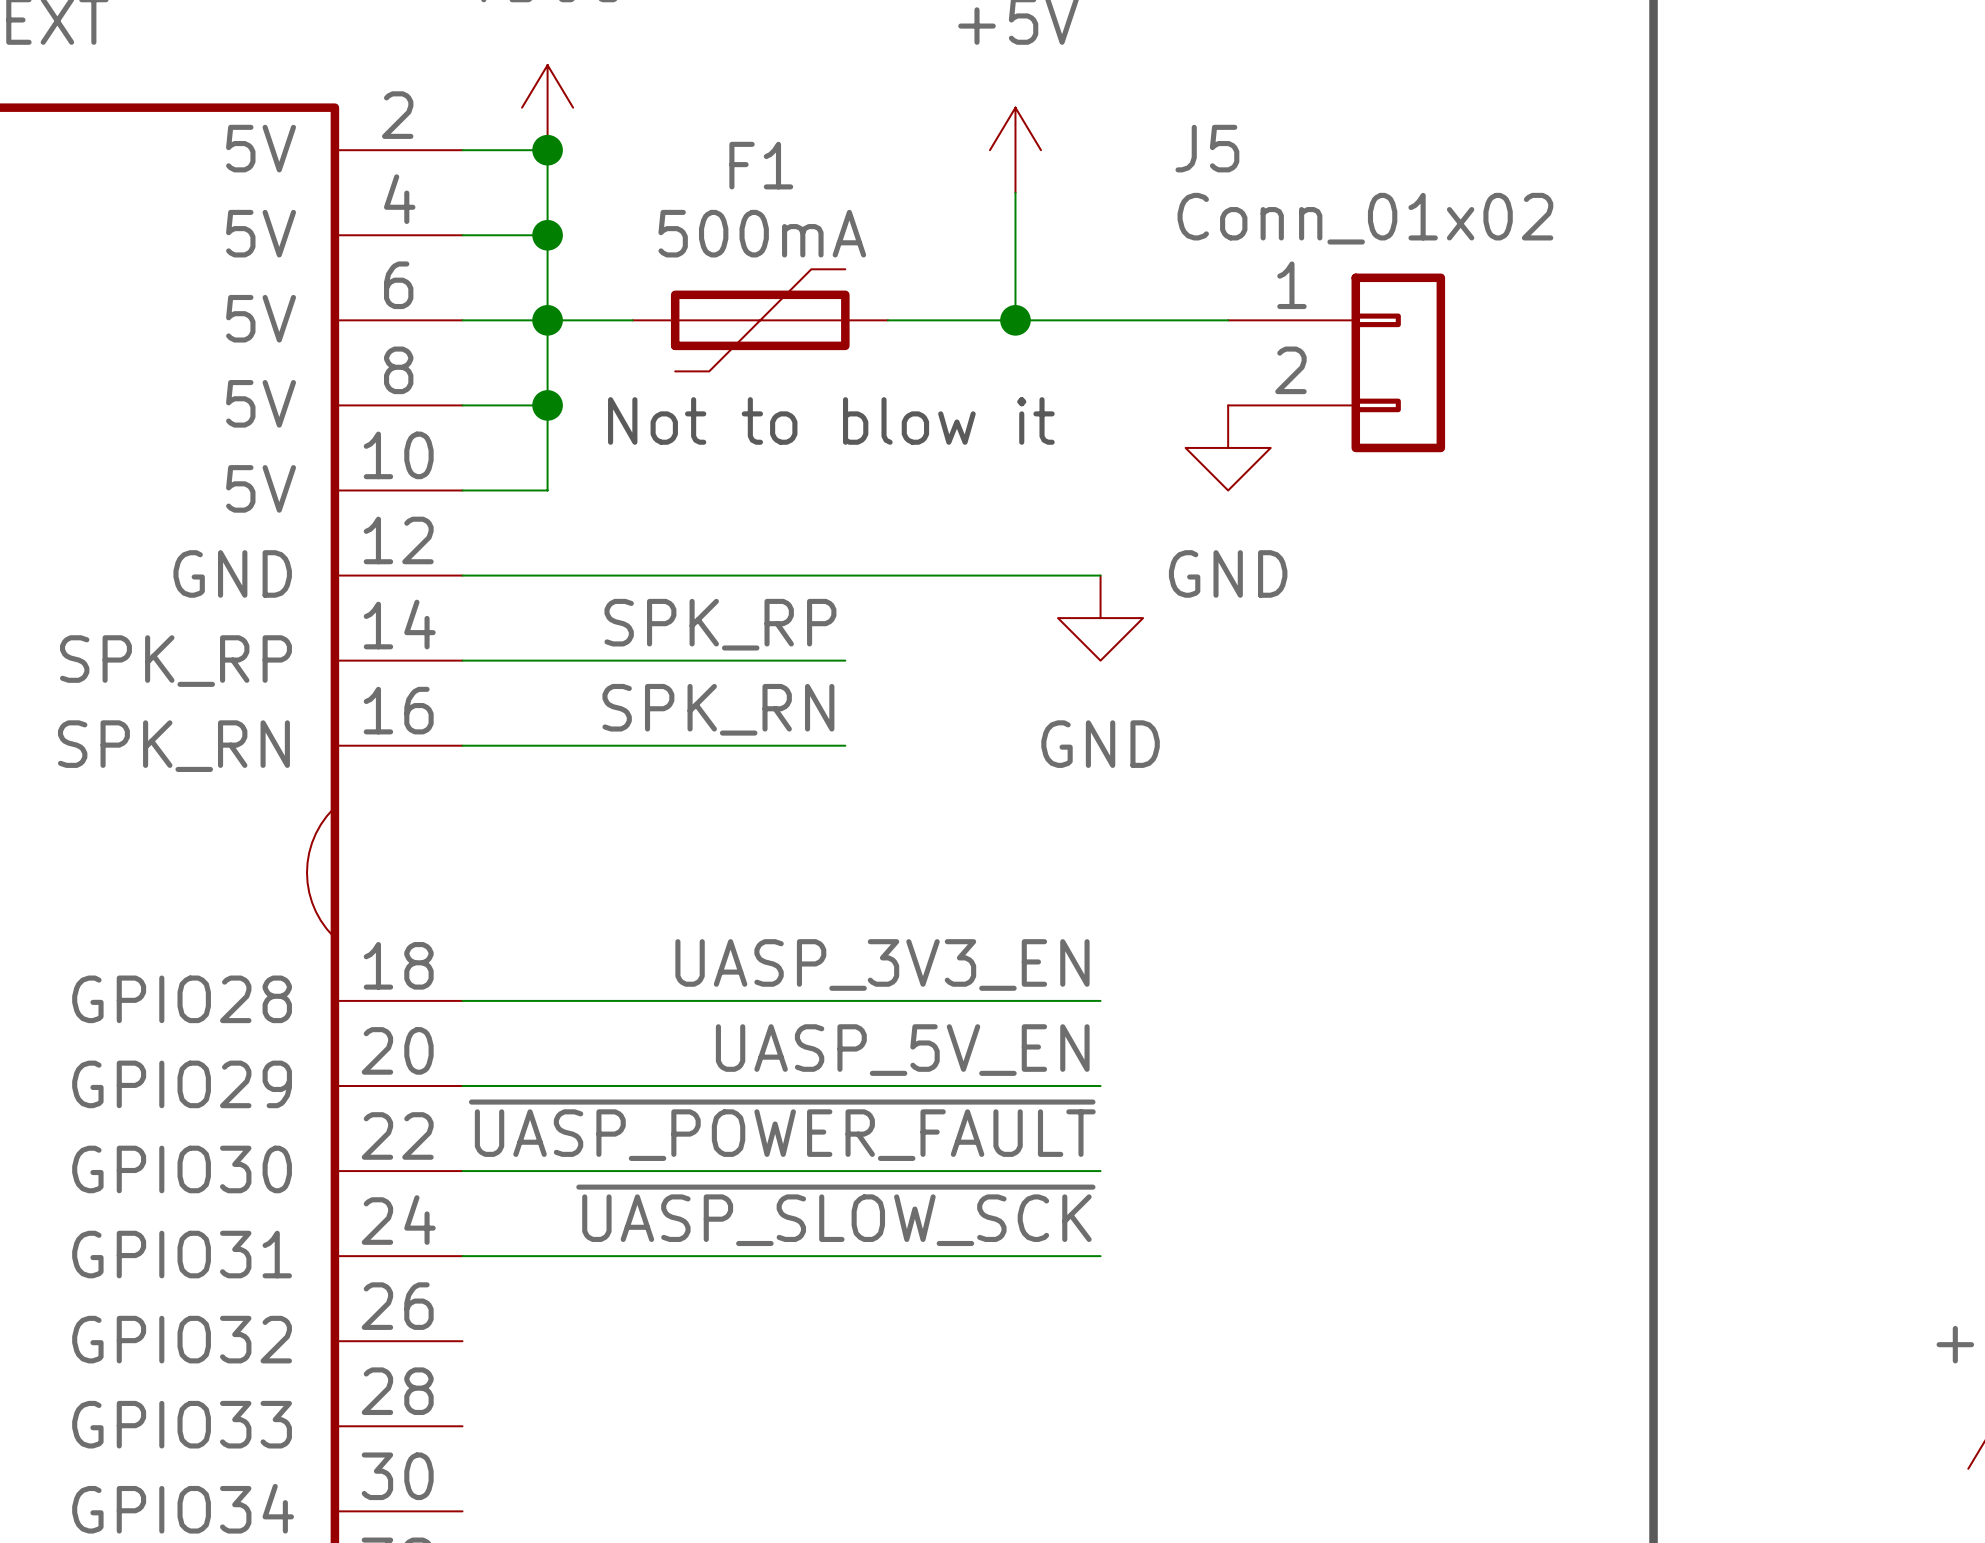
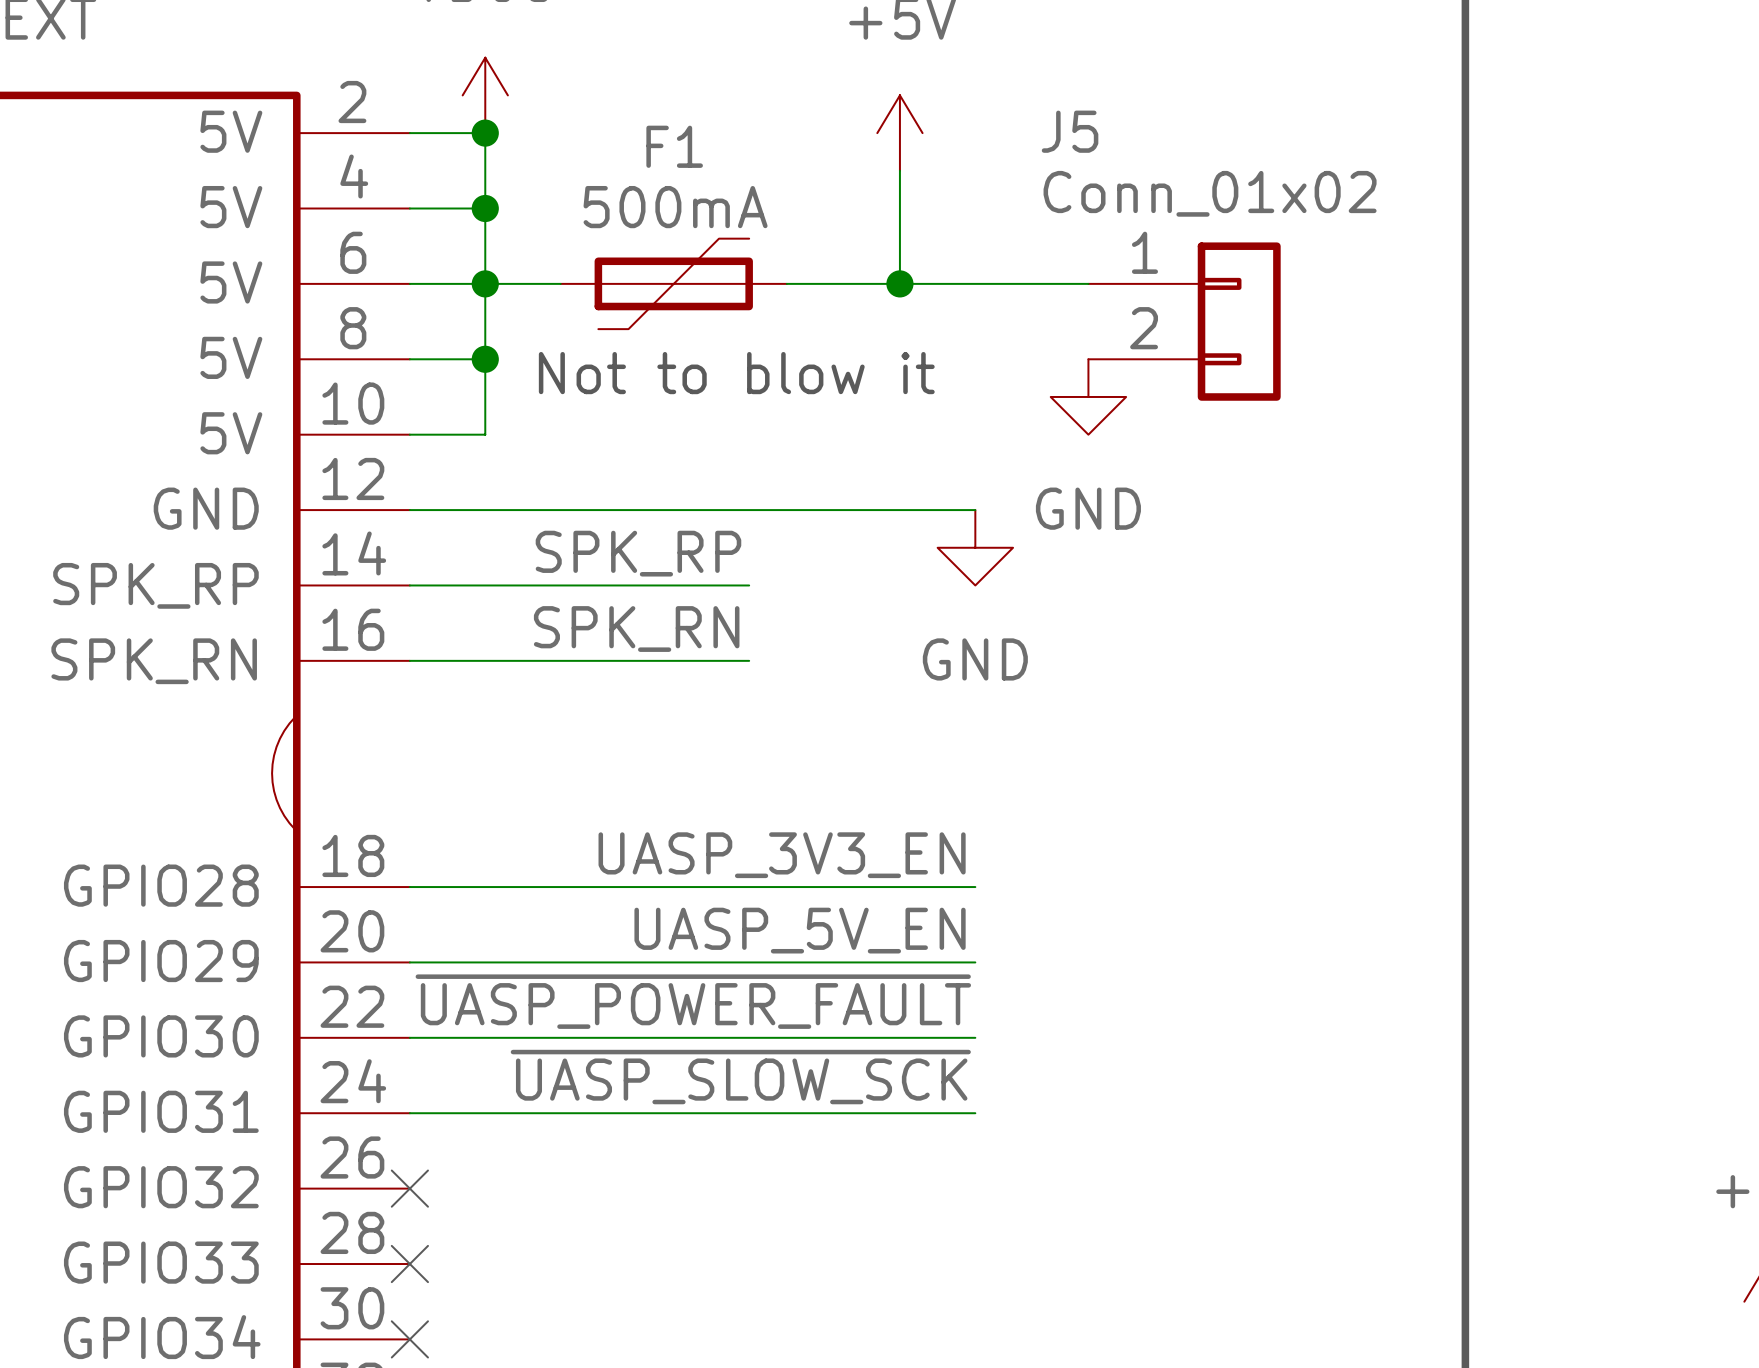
no-connect mark: none -> (409, 1188)
no-connect mark: none -> (409, 1264)
no-connect mark: none -> (409, 1339)

